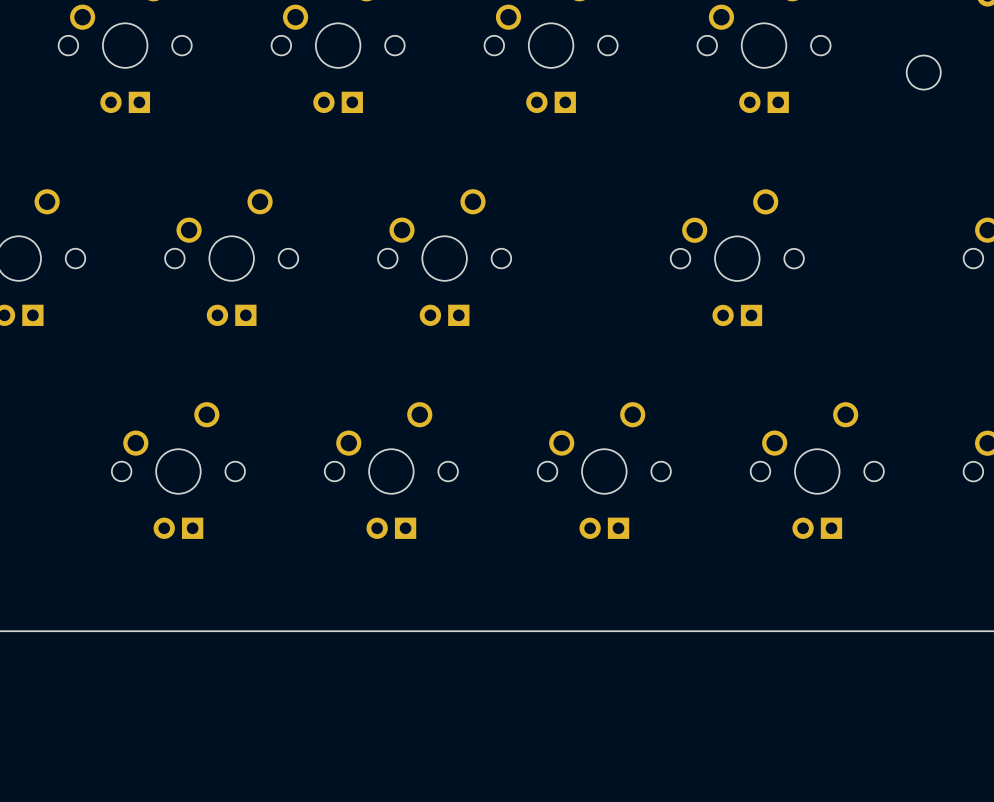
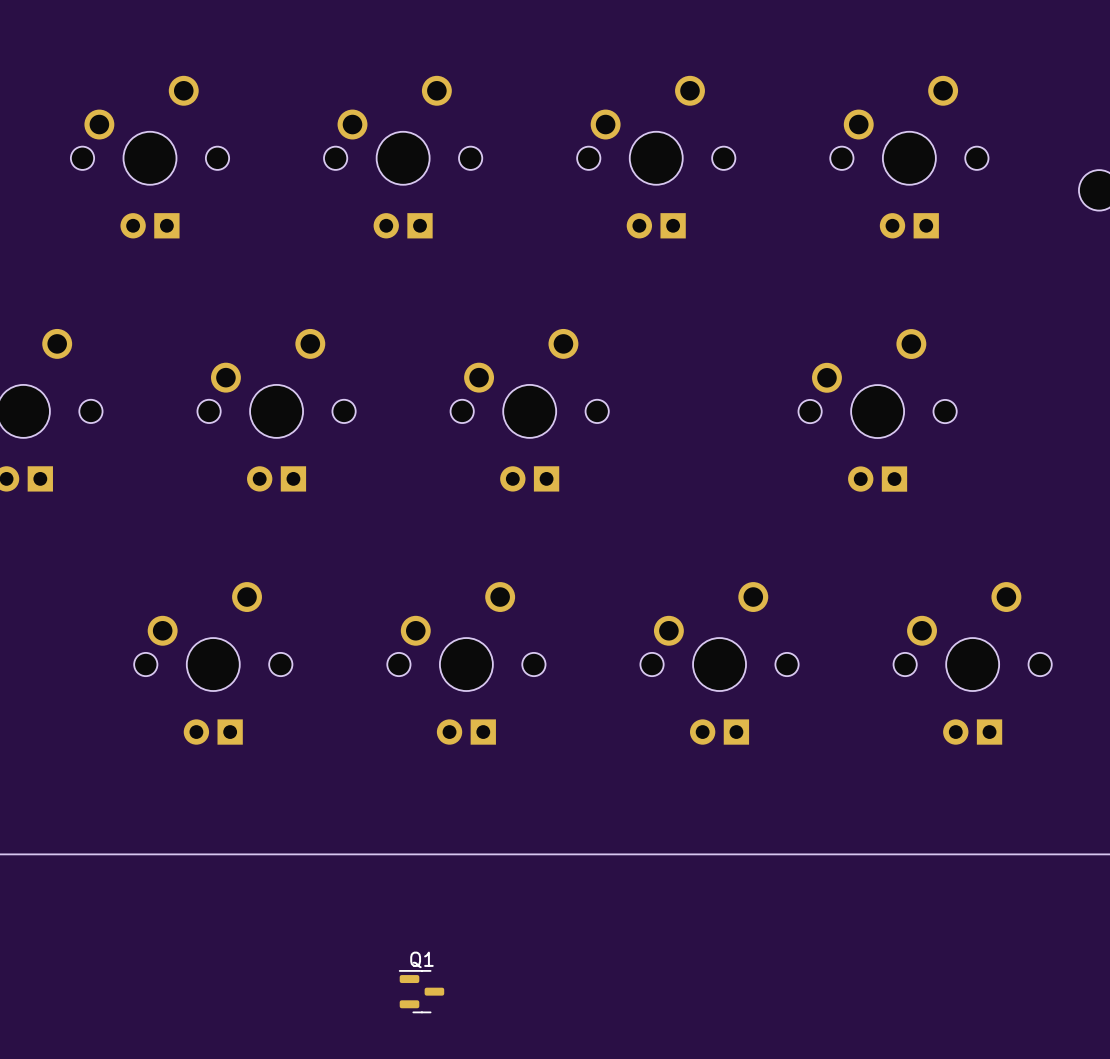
Q1: none -> (421, 991)

